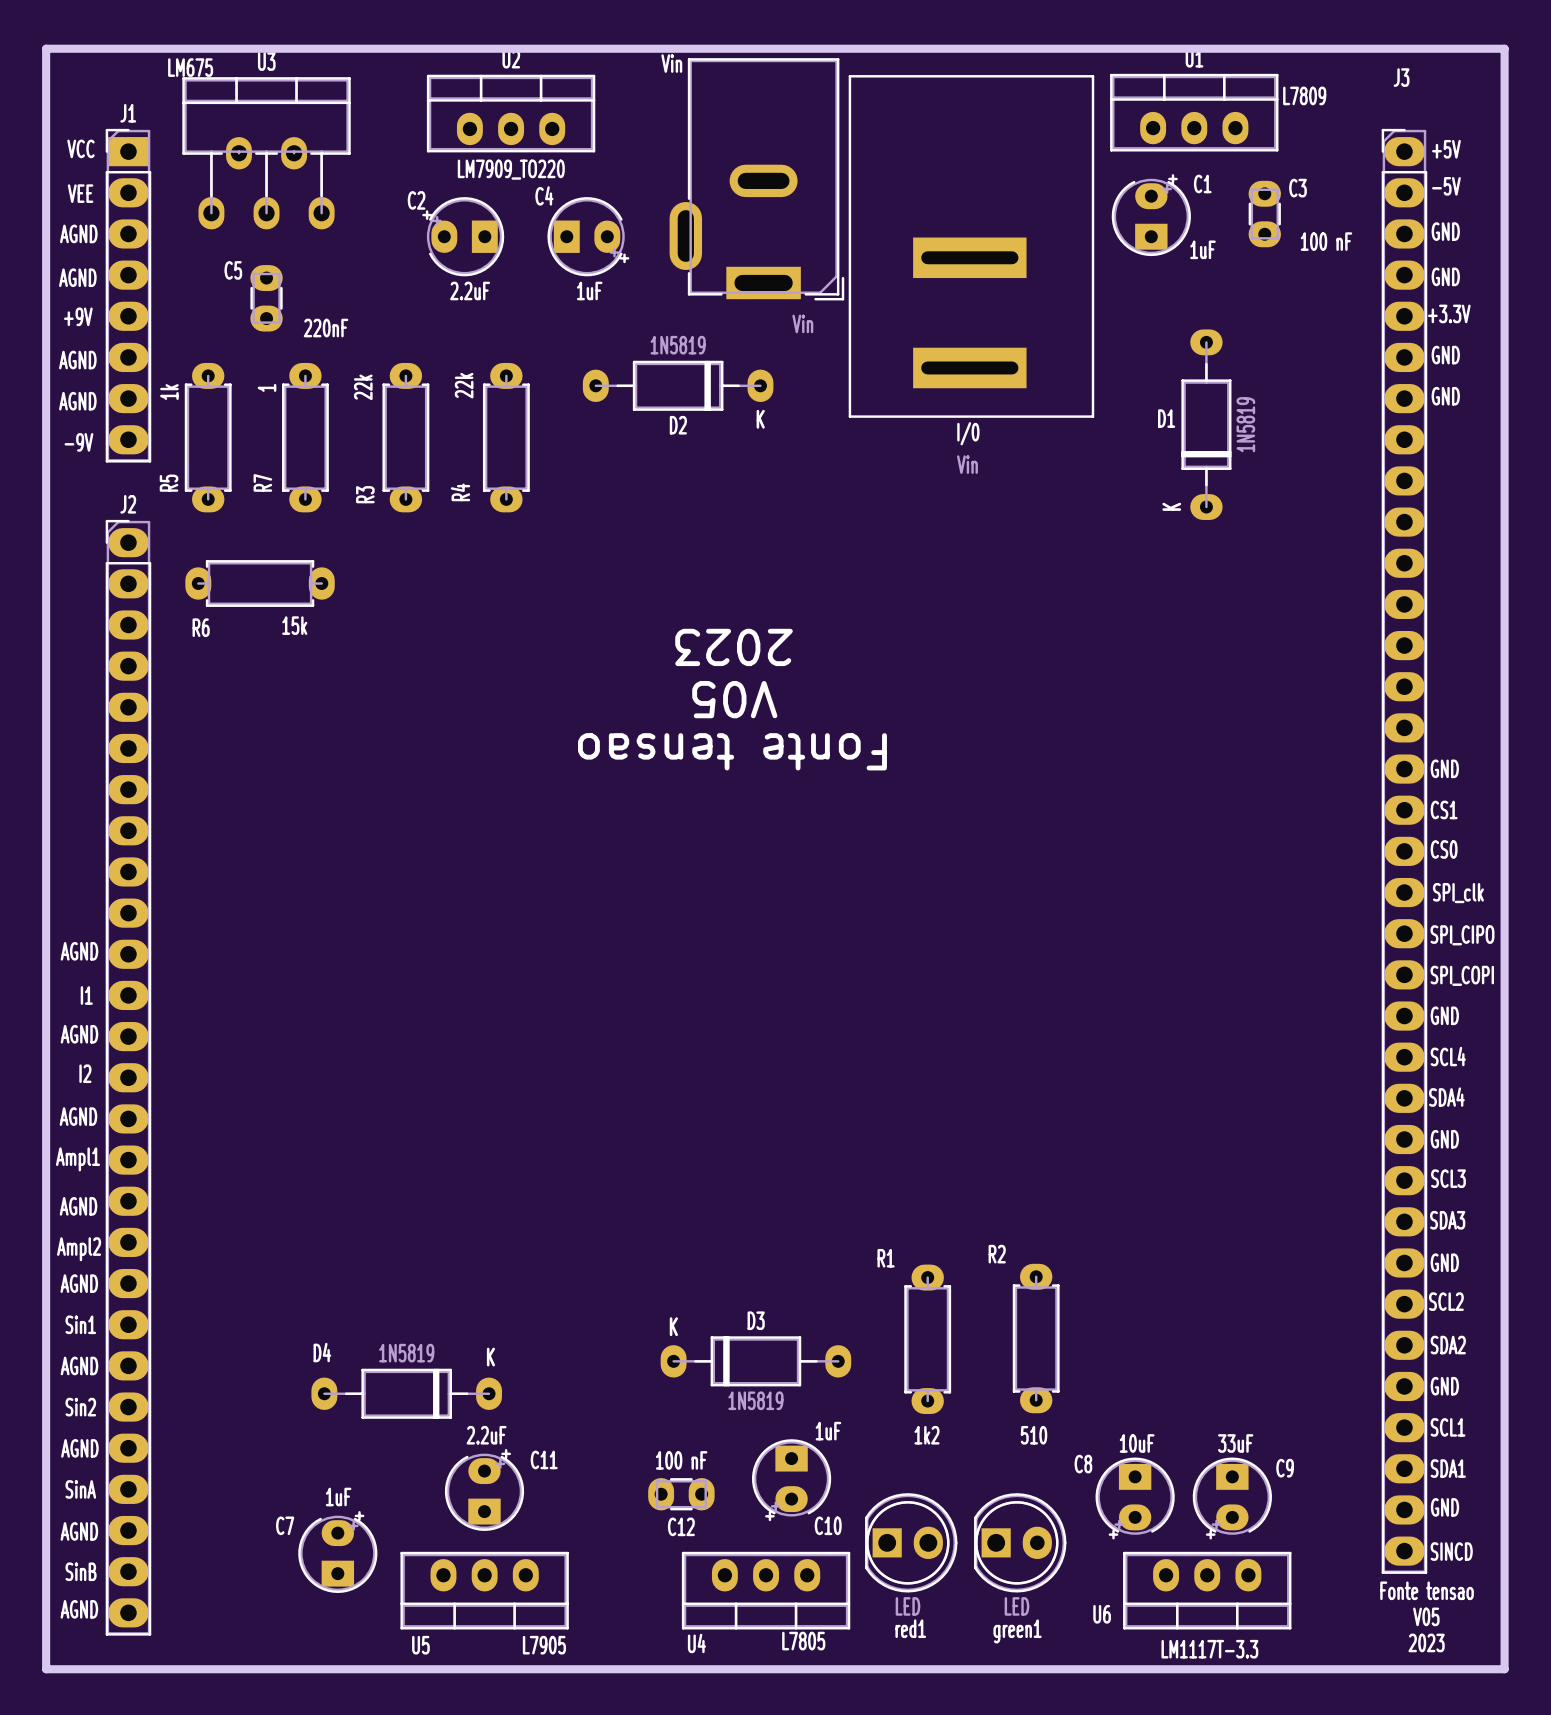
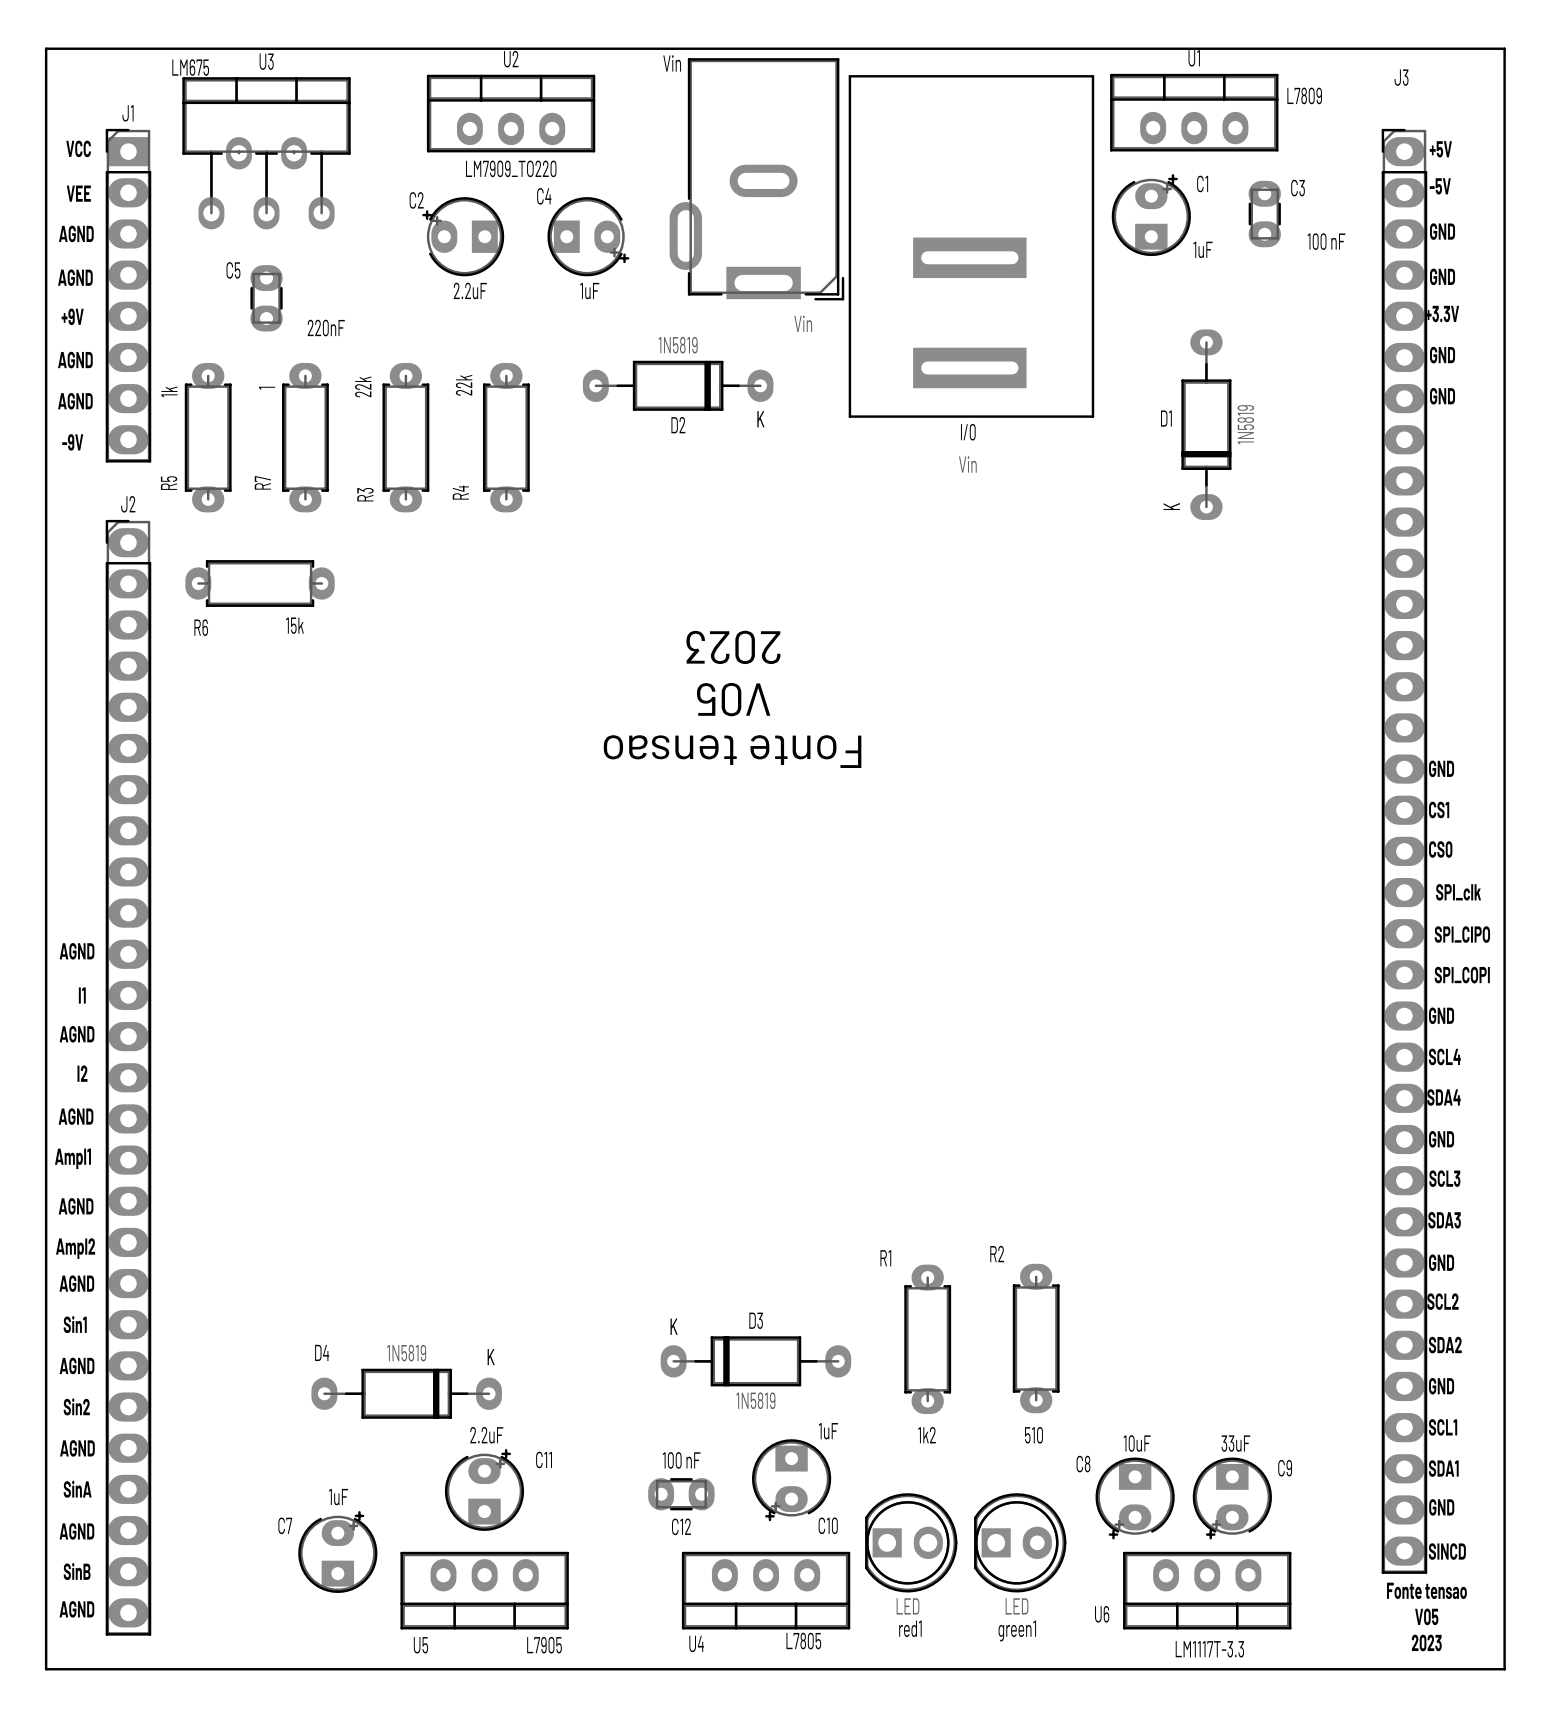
board edge width: thick (46, 48) (1504, 48) (1504, 1669) (46, 1669) (46, 48) -> thin (46, 48) (1504, 48) (1504, 1669) (46, 1669) (46, 48)

